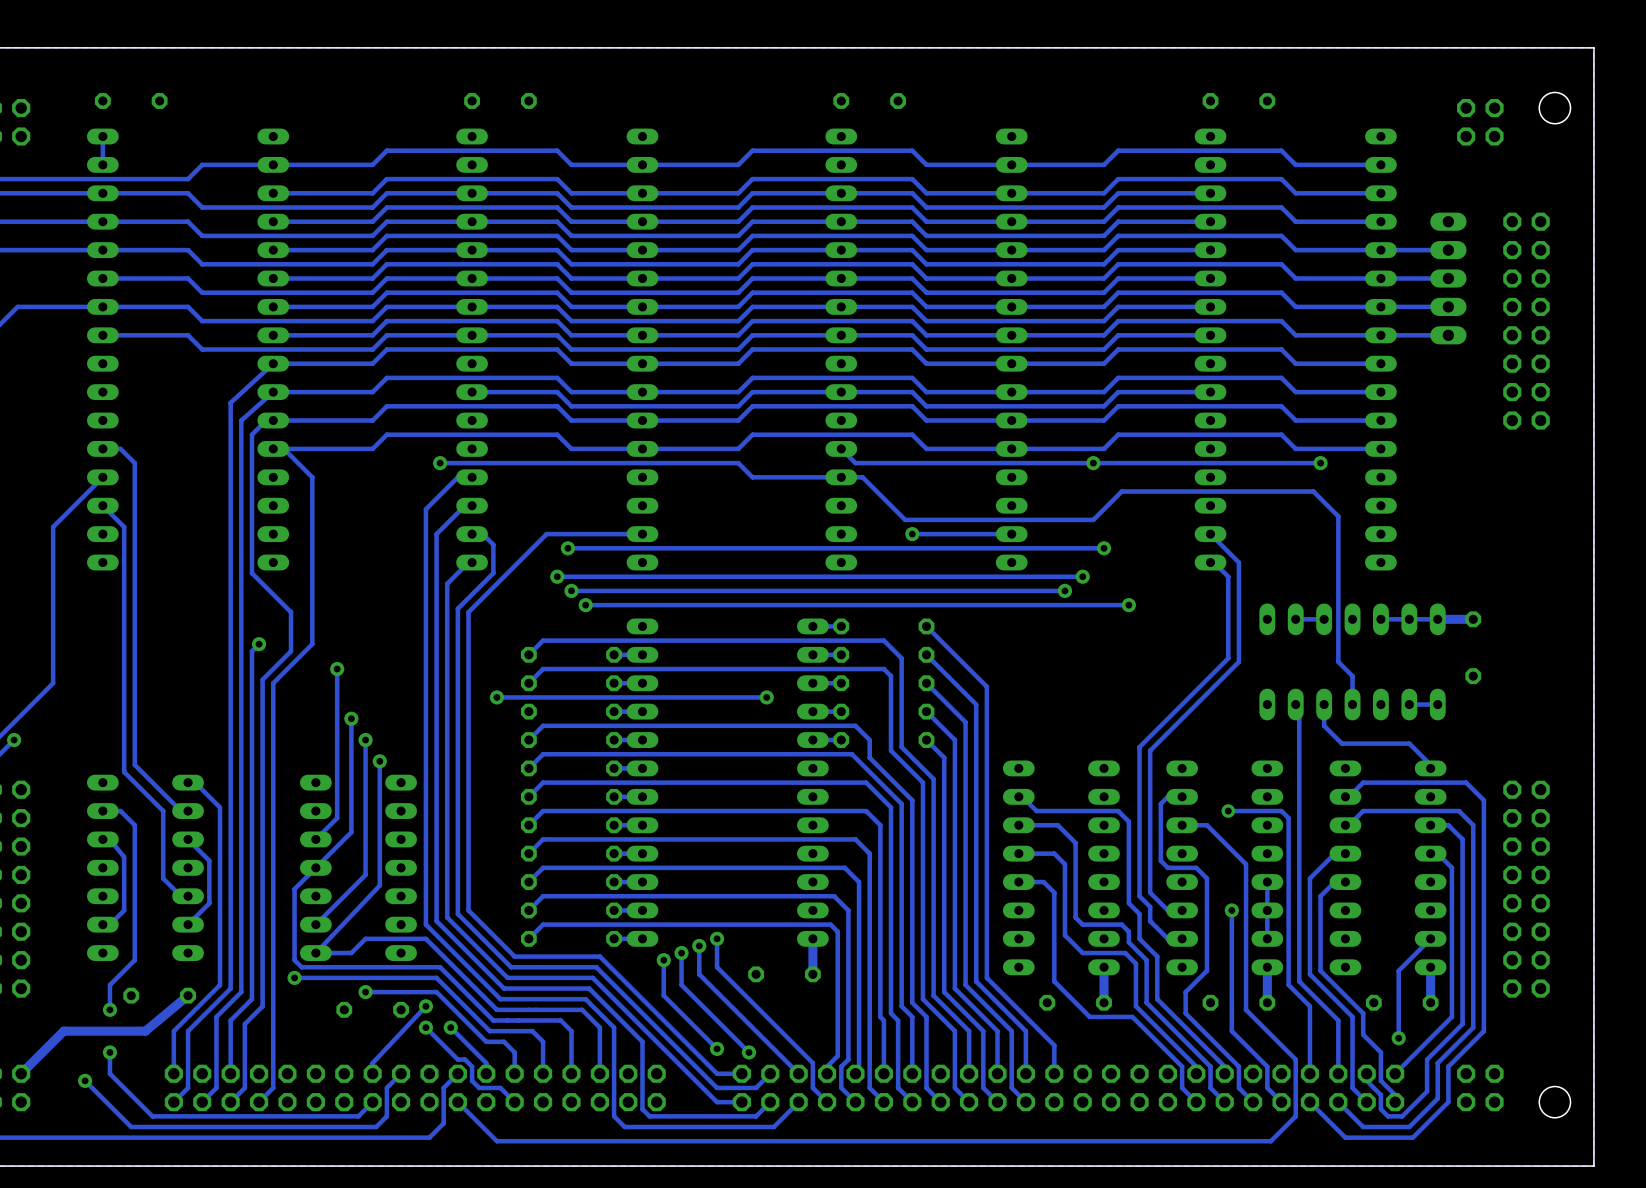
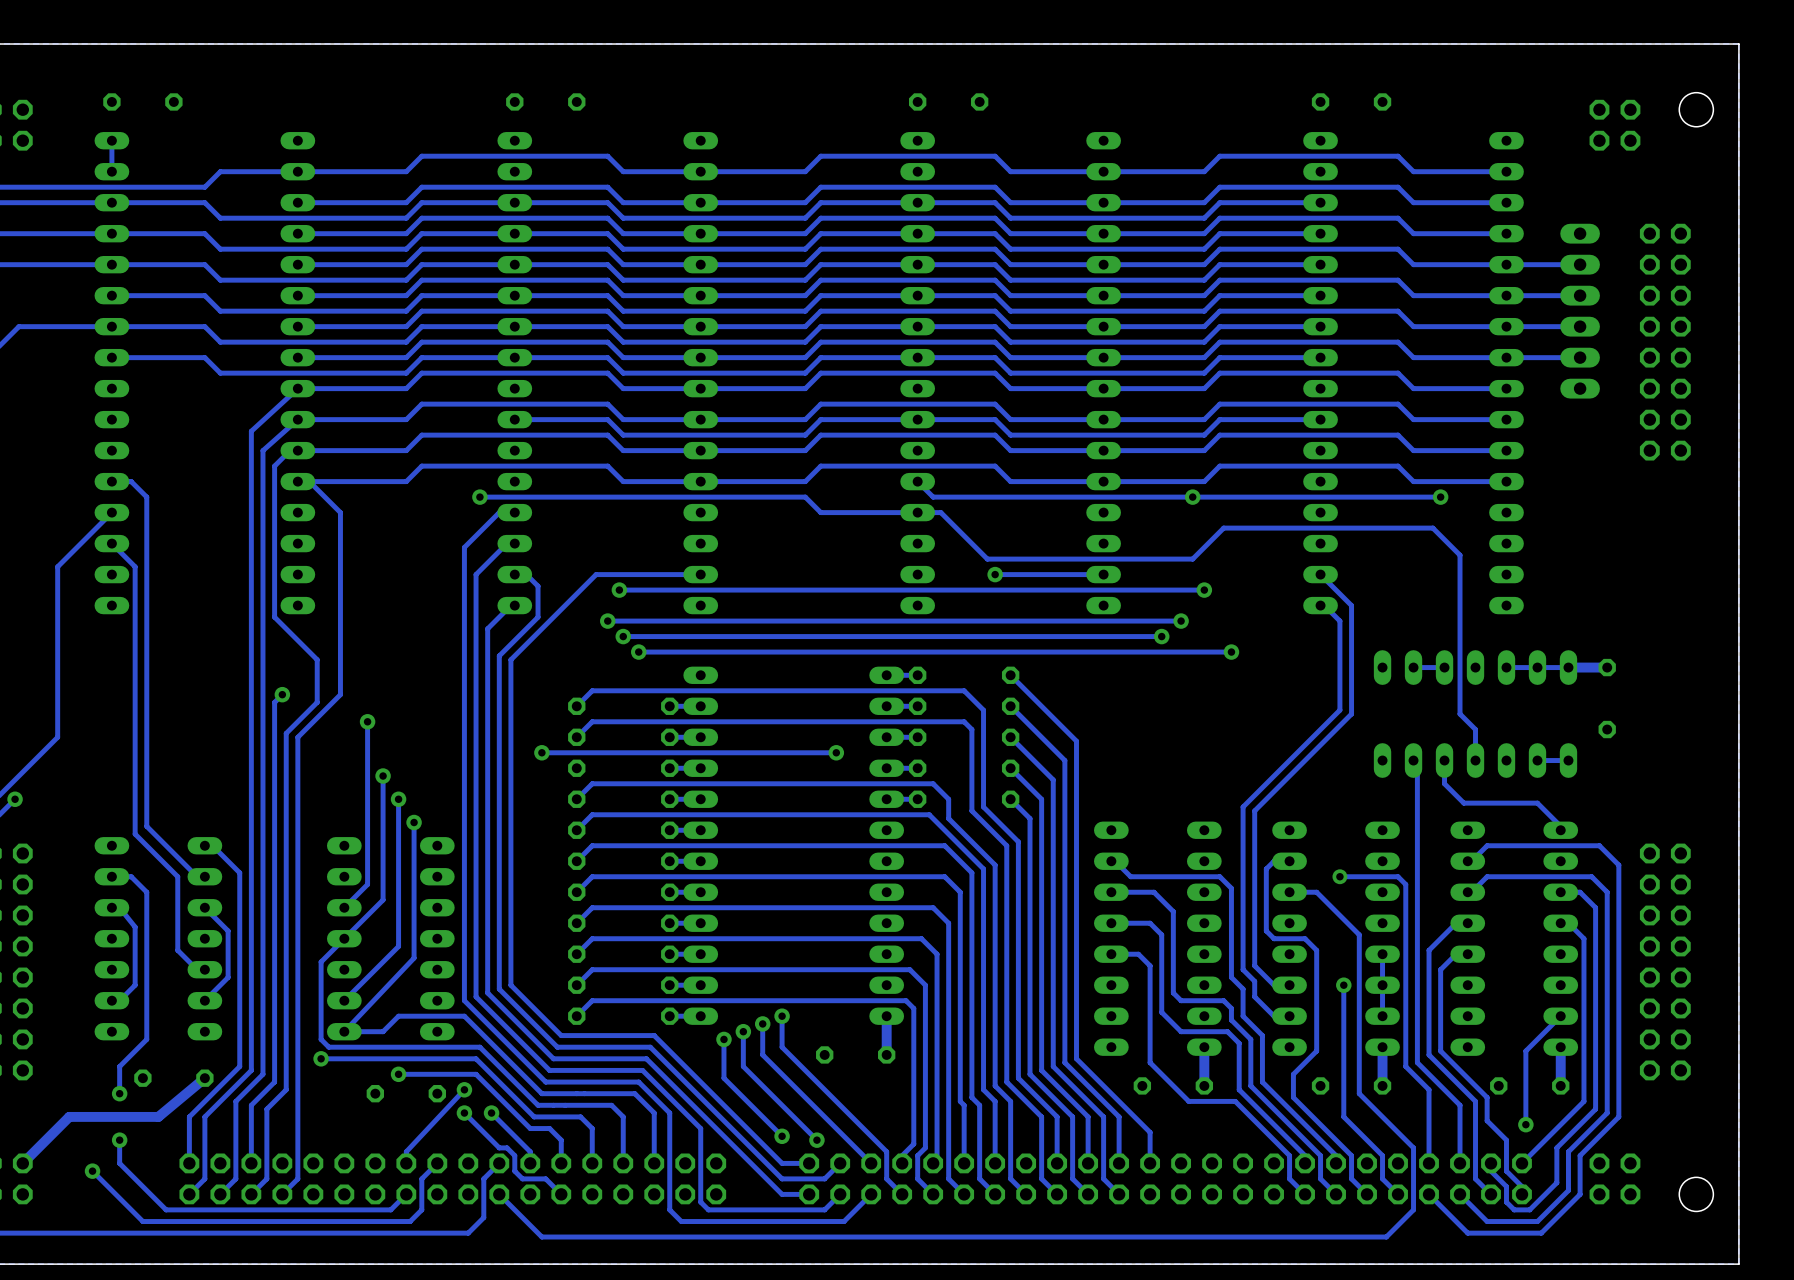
part: none -> (1580, 311)

